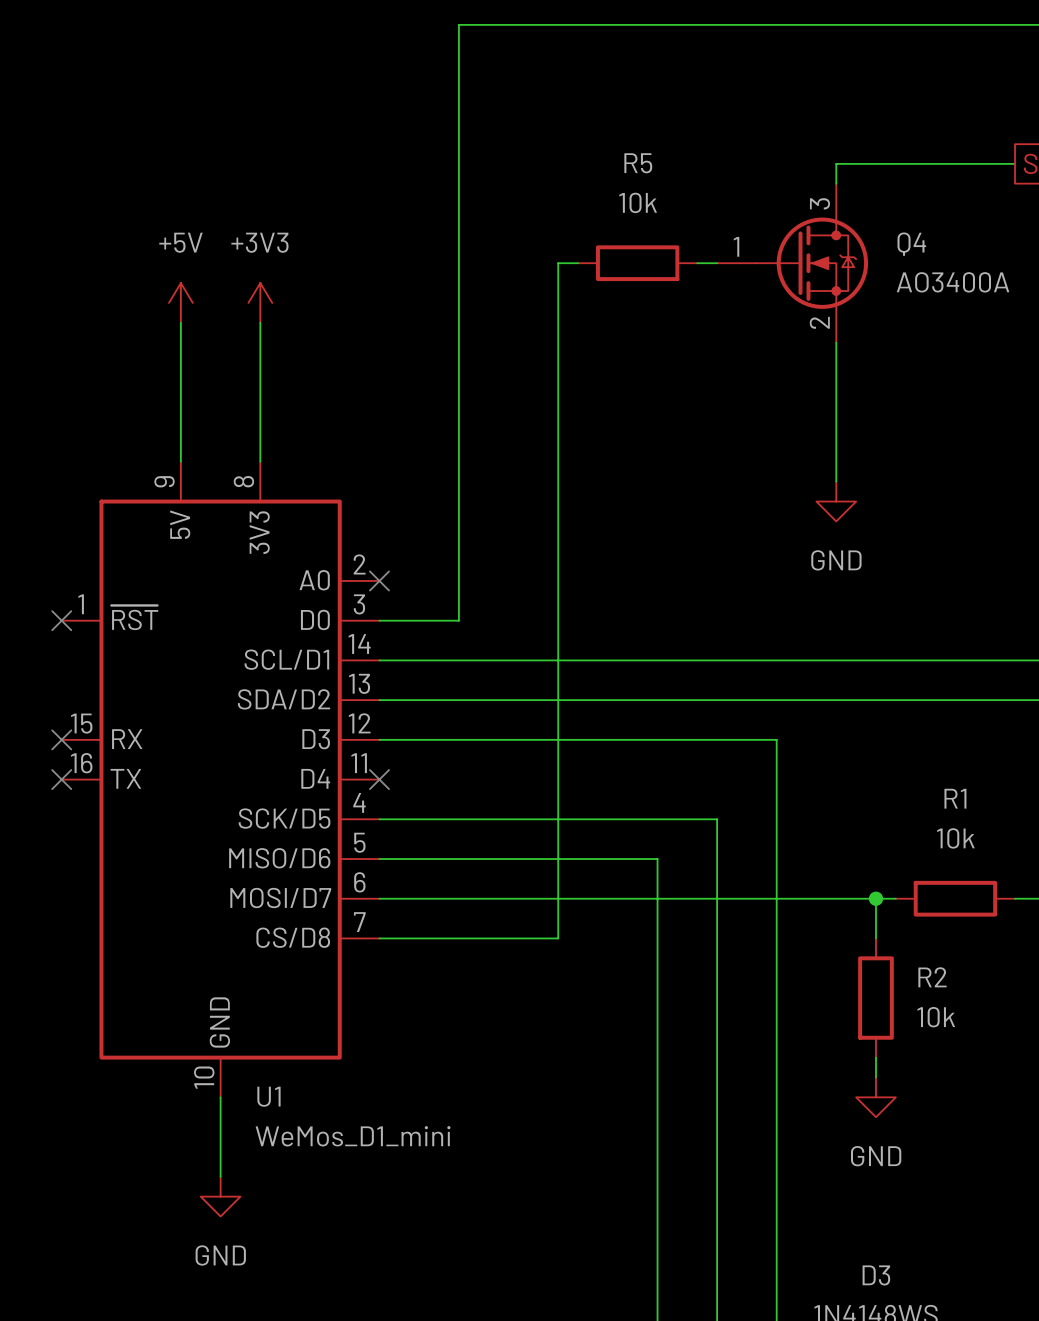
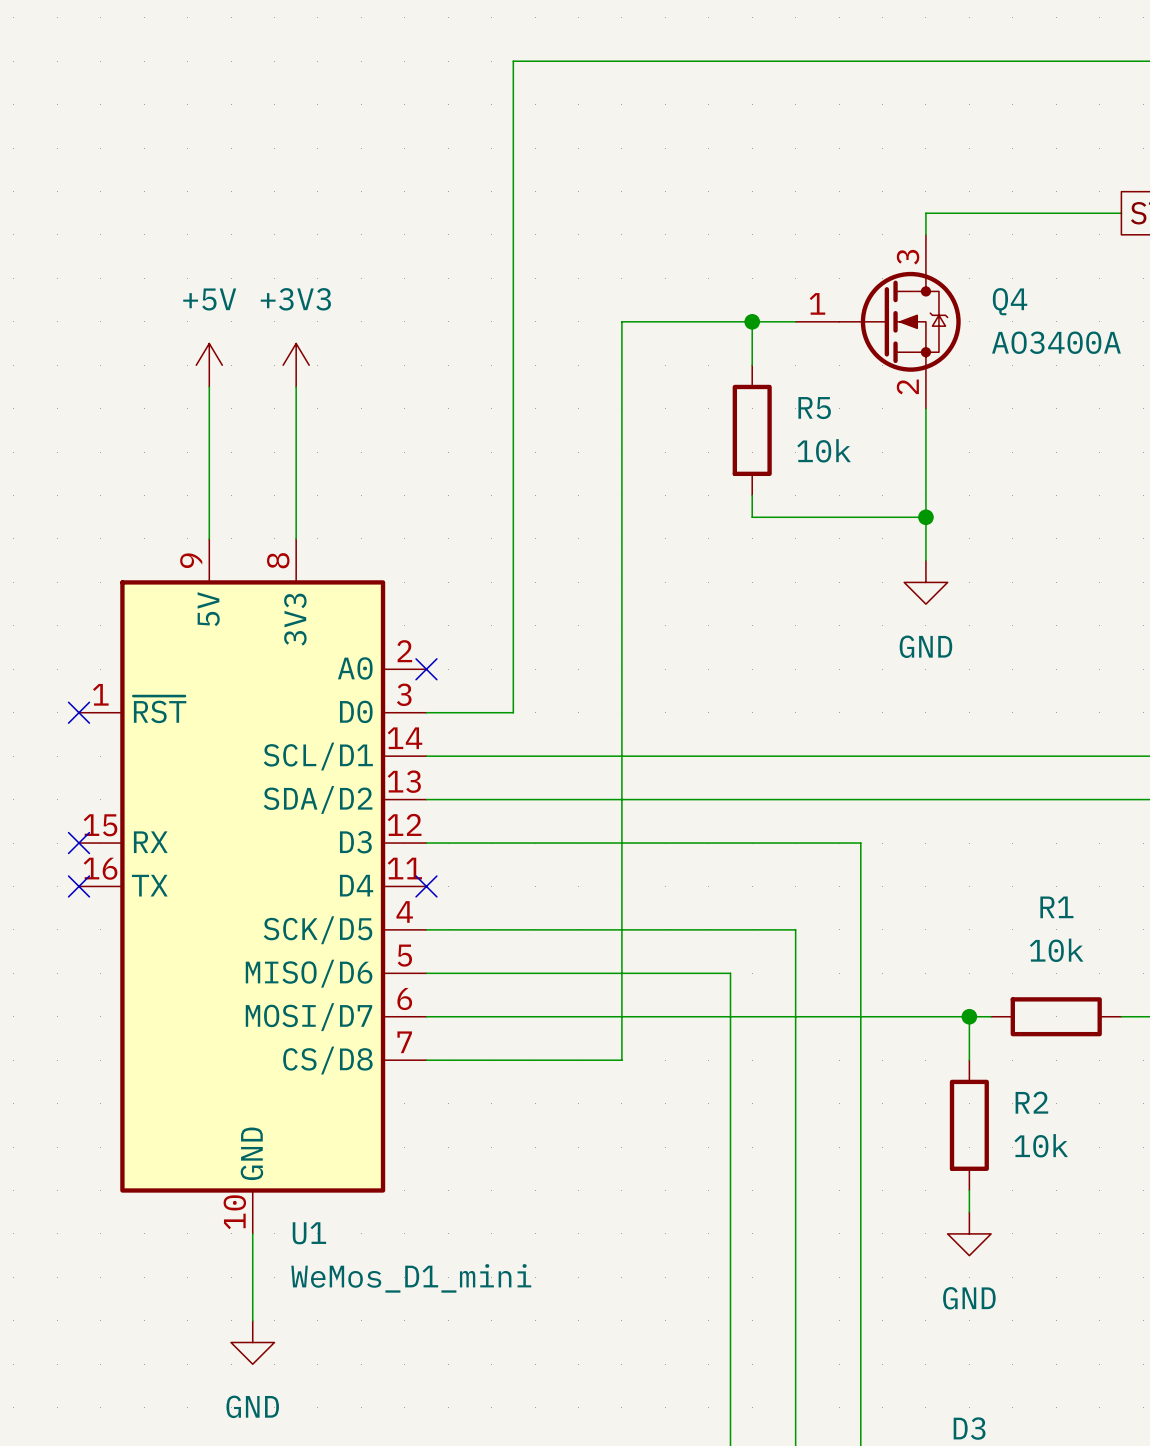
R5 name position: R5 (638, 163) -> R5 (814, 408)
wire: none -> (643, 321) (773, 321)
R5 rotation: 0° (637, 263) -> 90° clockwise (752, 430)
R5 position: (637, 263) -> (752, 430)
wire: none -> (752, 321) (752, 365)
junction: none -> (752, 321)
wire: none -> (752, 495) (752, 517) (925, 517)
junction: none -> (925, 517)

